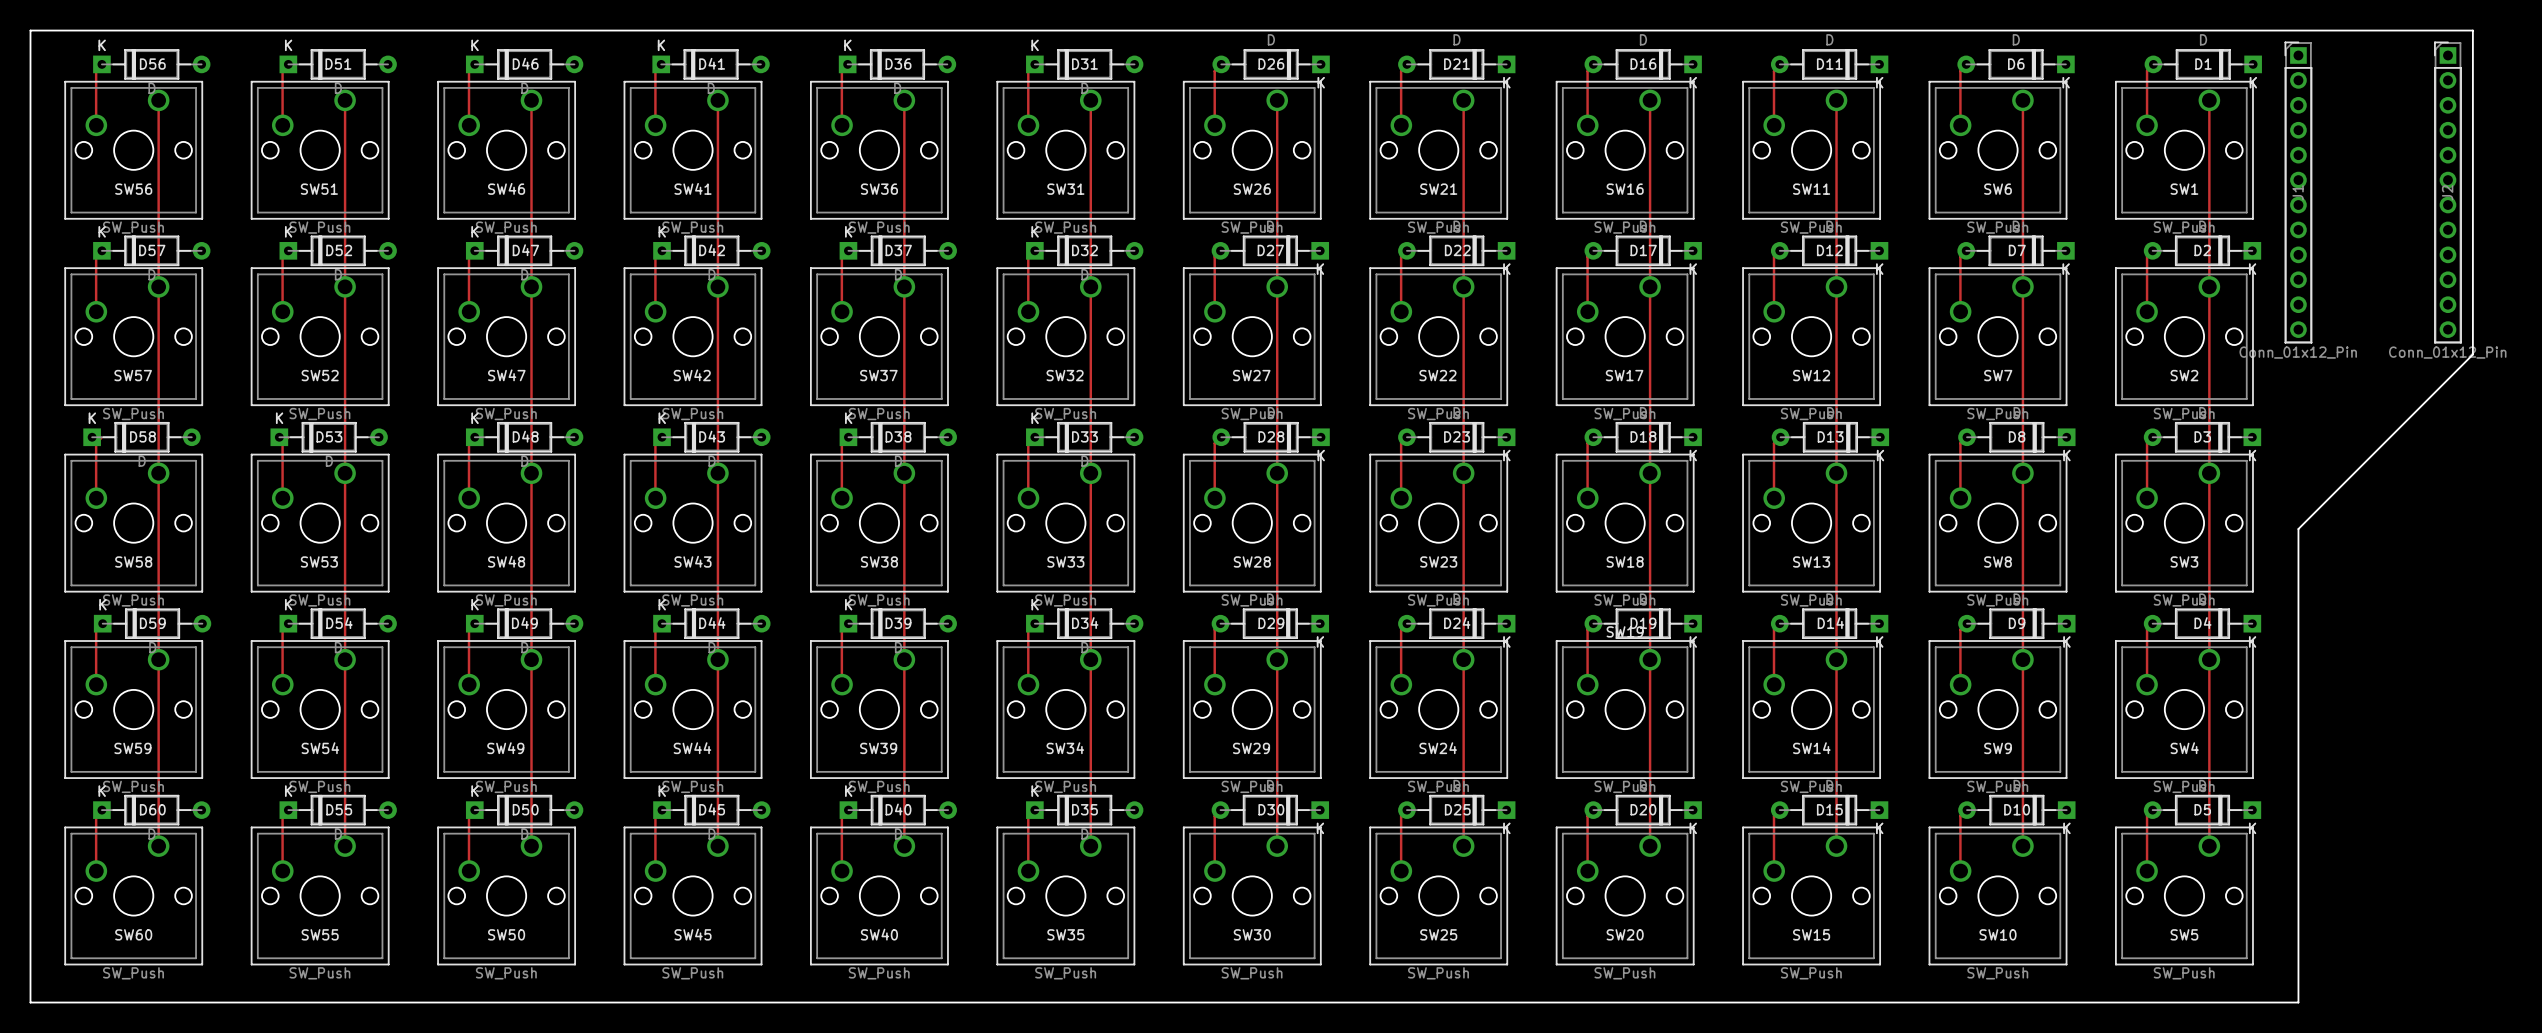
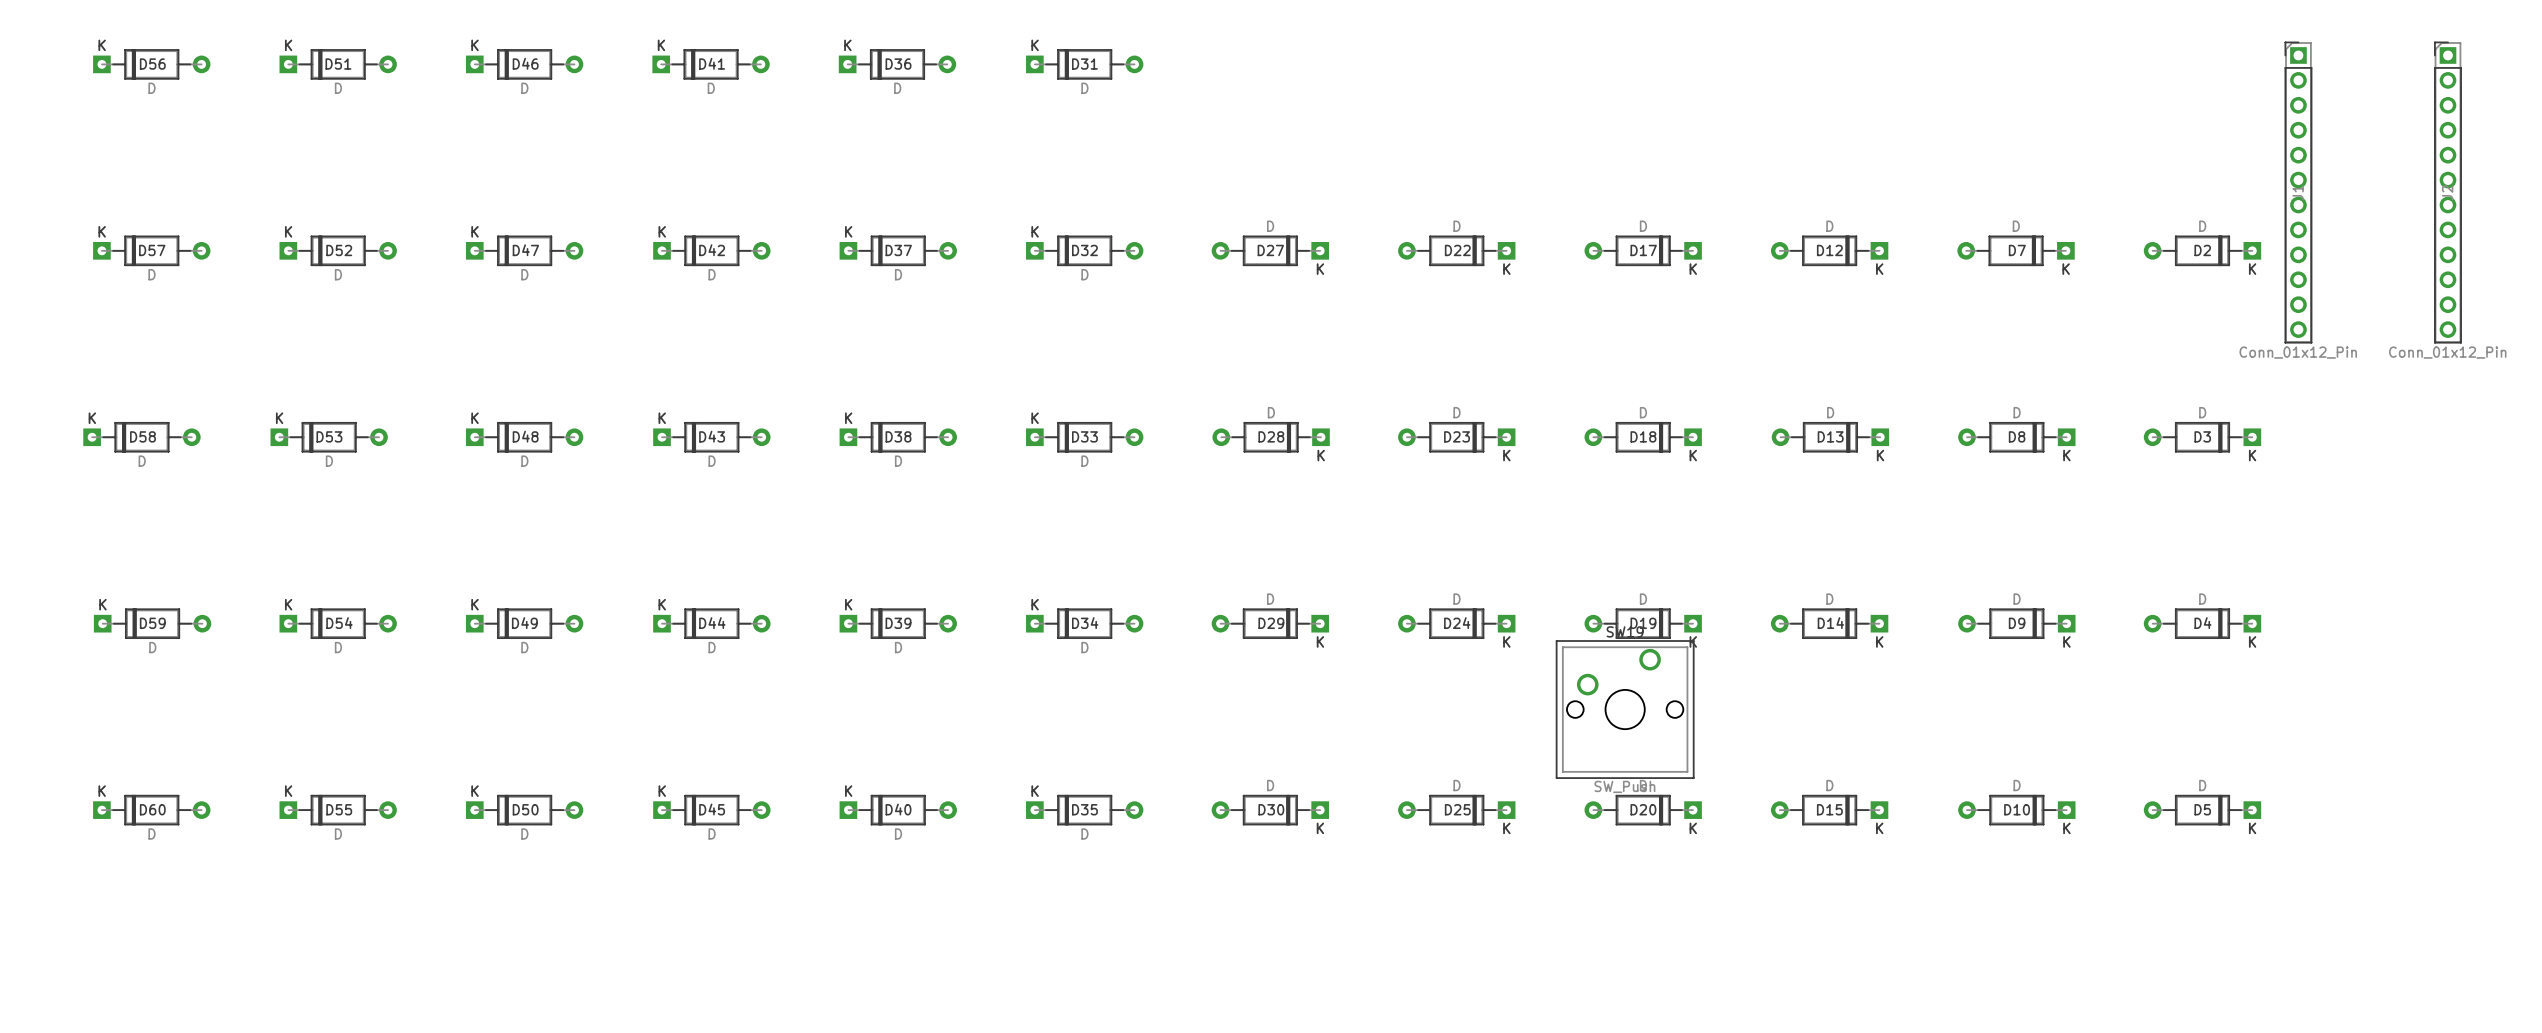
board edge: (30, 30) (30, 1002) (2298, 1002) (2298, 529) (2472, 354) (2472, 30) (30, 30) -> none
top track: (102, 64) (96, 71) (96, 125) -> none
top track: (288, 64) (282, 71) (282, 125) -> none
top track: (475, 64) (469, 71) (469, 125) -> none
top track: (661, 64) (655, 71) (655, 125) -> none
top track: (848, 64) (841, 71) (841, 125) -> none
top track: (1034, 64) (1028, 71) (1028, 125) -> none
top track: (1221, 64) (1214, 71) (1214, 125) -> none
D26: D (1271, 64) -> none
top track: (1407, 64) (1401, 71) (1401, 125) -> none
D21: D (1456, 64) -> none
top track: (1593, 64) (1587, 71) (1587, 125) -> none
D16: D (1643, 64) -> none
top track: (1780, 64) (1774, 71) (1774, 125) -> none
D11: D (1829, 64) -> none
top track: (1966, 64) (1960, 71) (1960, 125) -> none
D6: D (2016, 64) -> none
top track: (2153, 64) (2147, 70) (2147, 125) -> none
D1: D (2203, 64) -> none
top track: (158, 100) (158, 846) -> none
top track: (345, 100) (345, 846) -> none
top track: (531, 100) (531, 846) -> none
top track: (717, 100) (717, 846) -> none
top track: (904, 100) (904, 846) -> none
top track: (1090, 100) (1090, 846) -> none
top track: (1277, 100) (1277, 846) -> none
top track: (1463, 100) (1463, 846) -> none
top track: (1650, 100) (1650, 846) -> none
top track: (1836, 100) (1836, 846) -> none
top track: (2022, 100) (2022, 846) -> none
top track: (2209, 100) (2209, 846) -> none
SW56: SW_Push (133, 150) -> none
SW51: SW_Push (320, 150) -> none
SW46: SW_Push (506, 150) -> none
SW41: SW_Push (693, 150) -> none
SW36: SW_Push (879, 150) -> none
SW31: SW_Push (1065, 150) -> none
SW26: SW_Push (1252, 150) -> none
SW21: SW_Push (1438, 150) -> none
SW16: SW_Push (1625, 150) -> none
SW11: SW_Push (1811, 150) -> none
SW6: SW_Push (1998, 150) -> none
SW1: SW_Push (2184, 150) -> none
top track: (2152, 250) (2147, 256) (2147, 311) -> none
top track: (101, 251) (96, 256) (96, 312) -> none
top track: (288, 251) (282, 256) (282, 312) -> none
top track: (474, 251) (469, 256) (469, 312) -> none
top track: (661, 251) (655, 256) (655, 312) -> none
top track: (847, 251) (841, 256) (841, 312) -> none
top track: (1033, 251) (1028, 256) (1028, 312) -> none
top track: (1220, 251) (1214, 256) (1214, 312) -> none
top track: (1406, 251) (1401, 256) (1401, 312) -> none
top track: (1593, 251) (1587, 256) (1587, 312) -> none
top track: (1779, 251) (1774, 256) (1774, 312) -> none
top track: (1966, 251) (1960, 256) (1960, 312) -> none
SW57: SW_Push (133, 336) -> none
SW52: SW_Push (320, 336) -> none
SW47: SW_Push (506, 336) -> none
SW42: SW_Push (693, 336) -> none
SW37: SW_Push (879, 336) -> none
SW32: SW_Push (1065, 336) -> none
SW27: SW_Push (1252, 336) -> none
SW22: SW_Push (1438, 336) -> none
SW17: SW_Push (1625, 336) -> none
SW12: SW_Push (1811, 336) -> none
SW7: SW_Push (1998, 336) -> none
SW2: SW_Push (2184, 336) -> none
top track: (101, 437) (96, 443) (96, 498) -> none
top track: (288, 437) (282, 443) (282, 498) -> none
top track: (474, 437) (469, 443) (469, 498) -> none
top track: (661, 437) (655, 443) (655, 498) -> none
top track: (847, 437) (841, 443) (841, 498) -> none
top track: (1033, 437) (1028, 443) (1028, 498) -> none
top track: (1220, 437) (1214, 443) (1214, 498) -> none
top track: (1406, 437) (1401, 443) (1401, 498) -> none
top track: (1593, 437) (1587, 443) (1587, 498) -> none
top track: (1779, 437) (1774, 443) (1774, 498) -> none
top track: (1966, 437) (1960, 443) (1960, 498) -> none
top track: (2152, 437) (2147, 442) (2147, 498) -> none
SW58: SW_Push (133, 523) -> none
SW53: SW_Push (320, 523) -> none
SW48: SW_Push (506, 523) -> none
SW43: SW_Push (693, 523) -> none
SW38: SW_Push (879, 523) -> none
SW33: SW_Push (1065, 523) -> none
SW28: SW_Push (1252, 523) -> none
SW23: SW_Push (1438, 523) -> none
SW18: SW_Push (1625, 523) -> none
SW13: SW_Push (1811, 523) -> none
SW8: SW_Push (1998, 523) -> none
SW3: SW_Push (2184, 523) -> none
top track: (2152, 623) (2147, 629) (2147, 684) -> none
top track: (101, 624) (96, 629) (96, 685) -> none
top track: (288, 624) (282, 629) (282, 685) -> none
top track: (474, 624) (469, 629) (469, 685) -> none
top track: (661, 624) (655, 629) (655, 685) -> none
top track: (847, 624) (841, 629) (841, 685) -> none
top track: (1033, 624) (1028, 629) (1028, 685) -> none
top track: (1220, 624) (1214, 629) (1214, 685) -> none
top track: (1406, 624) (1401, 629) (1401, 685) -> none
top track: (1593, 624) (1587, 629) (1587, 685) -> none
top track: (1779, 624) (1774, 629) (1774, 685) -> none
top track: (1966, 624) (1960, 629) (1960, 685) -> none
SW59: SW_Push (133, 709) -> none
SW54: SW_Push (320, 709) -> none
SW49: SW_Push (506, 709) -> none
SW44: SW_Push (693, 709) -> none
SW39: SW_Push (879, 709) -> none
SW34: SW_Push (1065, 709) -> none
SW29: SW_Push (1252, 709) -> none
SW24: SW_Push (1438, 709) -> none
SW14: SW_Push (1811, 709) -> none
SW9: SW_Push (1998, 709) -> none
SW4: SW_Push (2184, 709) -> none
top track: (101, 810) (96, 816) (96, 871) -> none
top track: (288, 810) (282, 816) (282, 871) -> none
top track: (474, 810) (469, 816) (469, 871) -> none
top track: (661, 810) (655, 816) (655, 871) -> none
top track: (847, 810) (841, 816) (841, 871) -> none
top track: (1033, 810) (1028, 816) (1028, 871) -> none
top track: (1220, 810) (1214, 816) (1214, 871) -> none
top track: (1406, 810) (1401, 816) (1401, 871) -> none
top track: (1593, 810) (1587, 816) (1587, 871) -> none
top track: (1779, 810) (1774, 816) (1774, 871) -> none
top track: (1966, 810) (1960, 816) (1960, 871) -> none
top track: (2152, 810) (2147, 815) (2147, 871) -> none
SW60: SW_Push (133, 895) -> none
SW55: SW_Push (320, 895) -> none
SW50: SW_Push (506, 895) -> none
SW45: SW_Push (693, 895) -> none
SW40: SW_Push (879, 895) -> none
SW35: SW_Push (1065, 895) -> none
SW30: SW_Push (1252, 895) -> none
SW25: SW_Push (1438, 895) -> none
SW20: SW_Push (1625, 895) -> none
SW15: SW_Push (1811, 895) -> none
SW10: SW_Push (1998, 895) -> none
SW5: SW_Push (2184, 895) -> none

